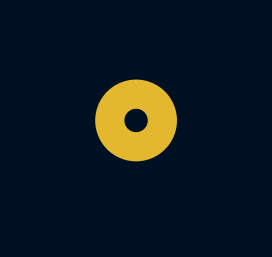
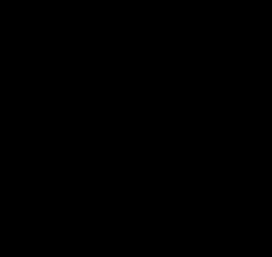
part: (136, 120) -> none

